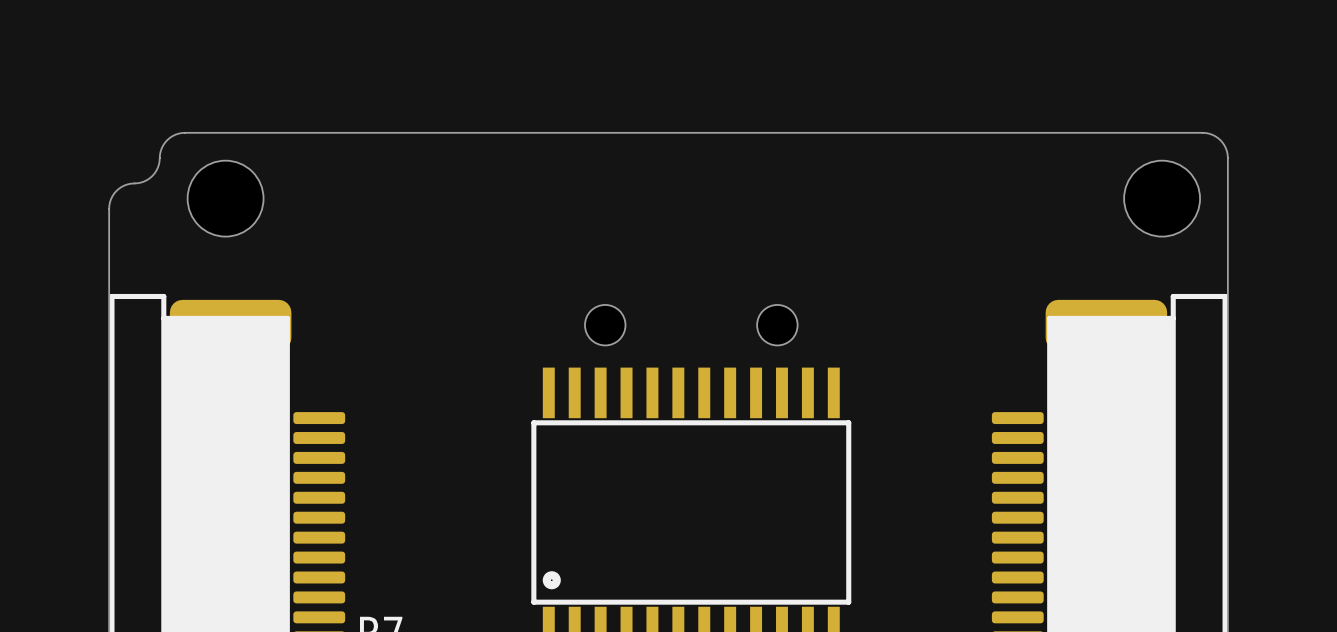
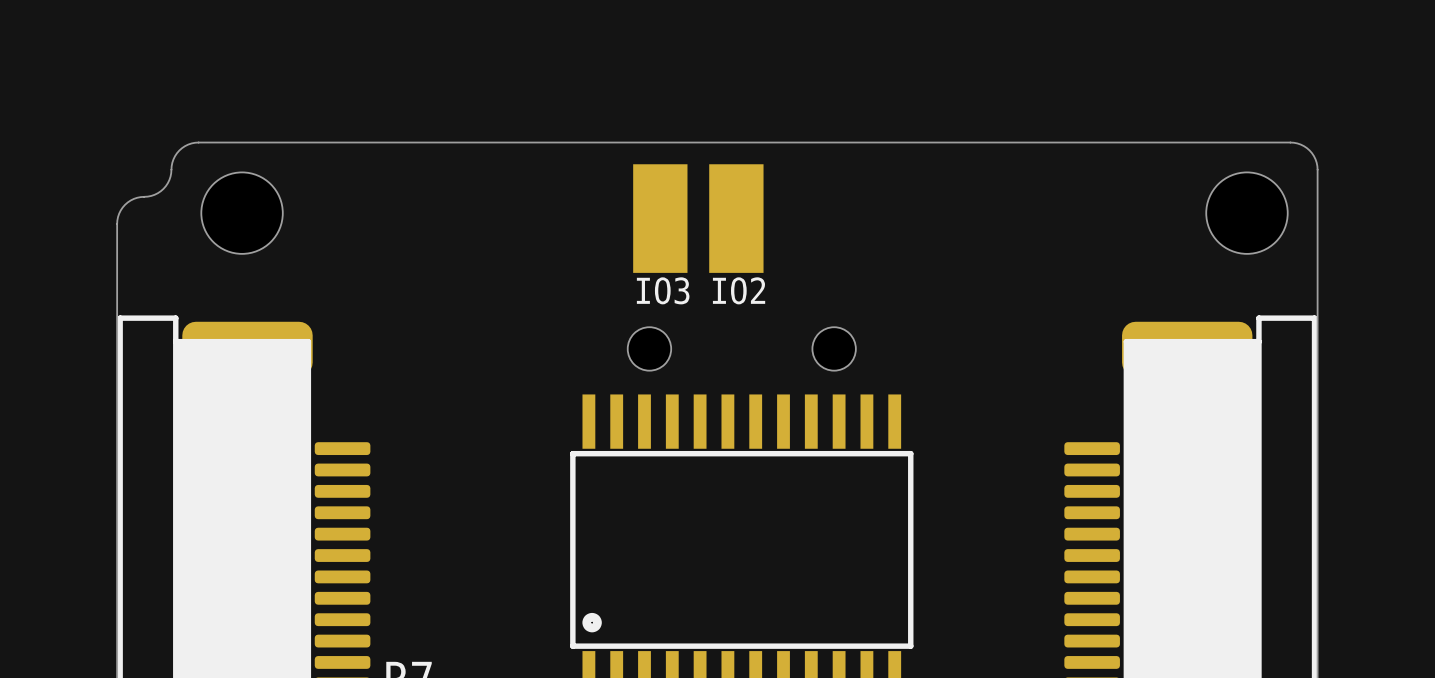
IO3: none -> (660, 218)
IO2: none -> (736, 218)

